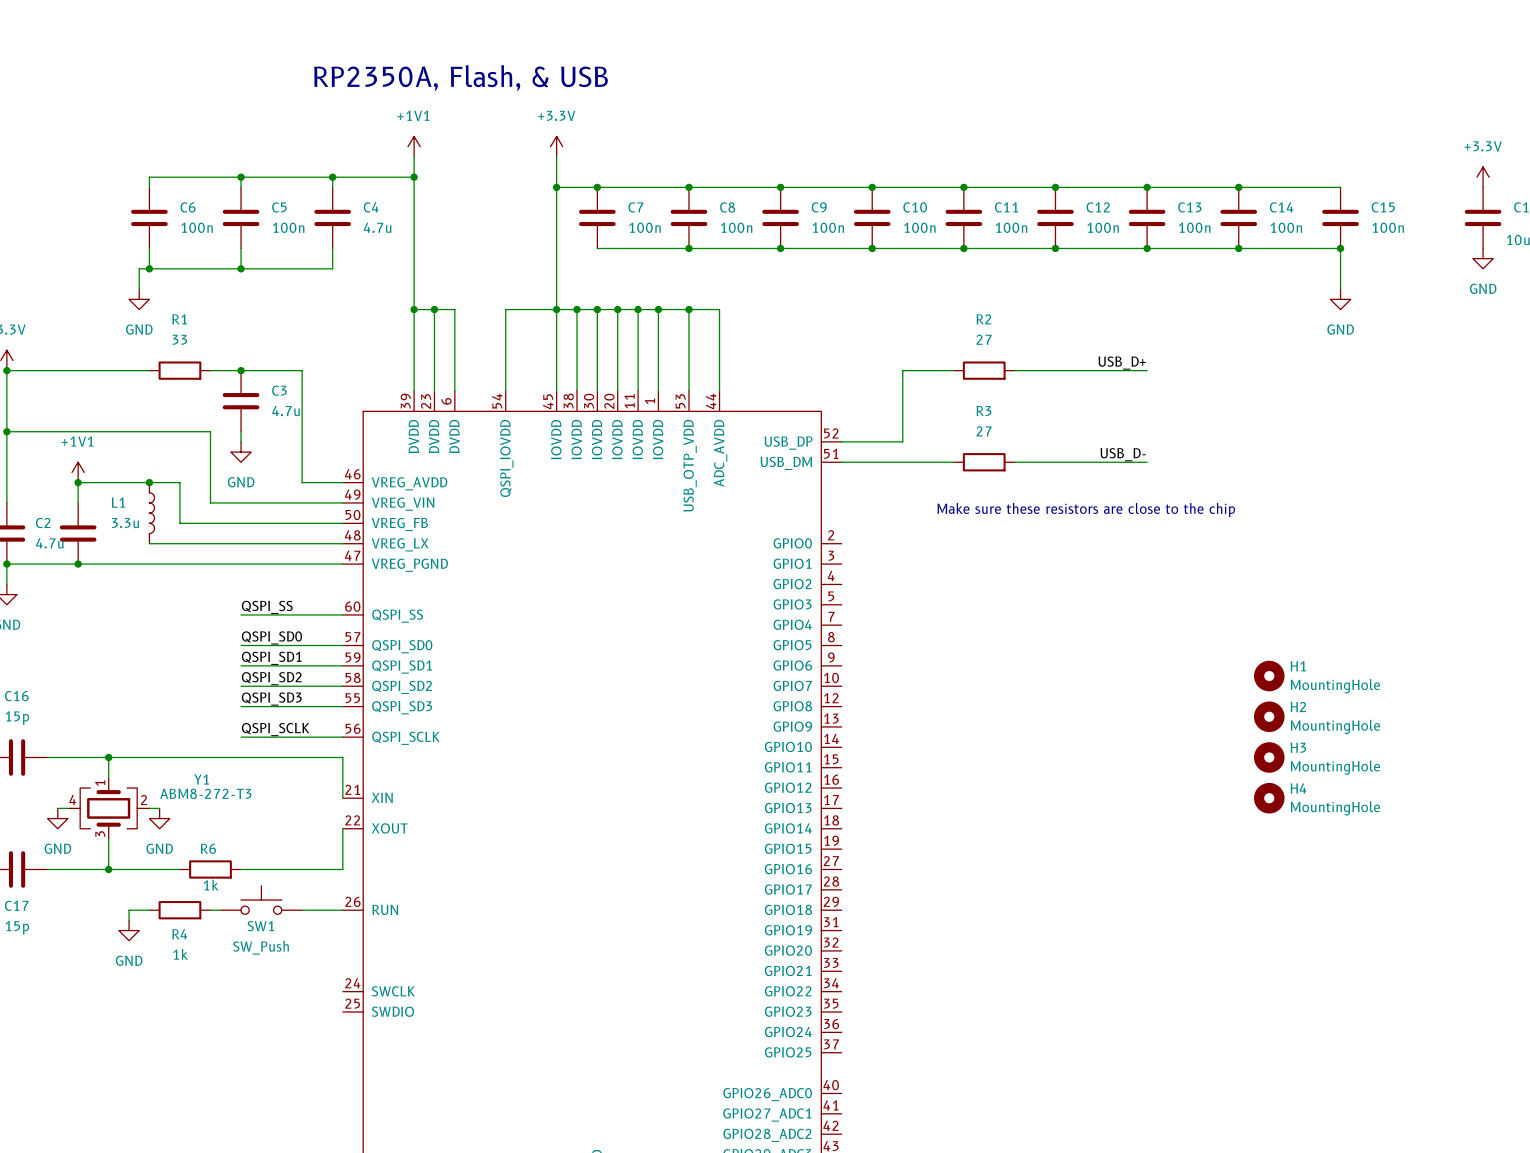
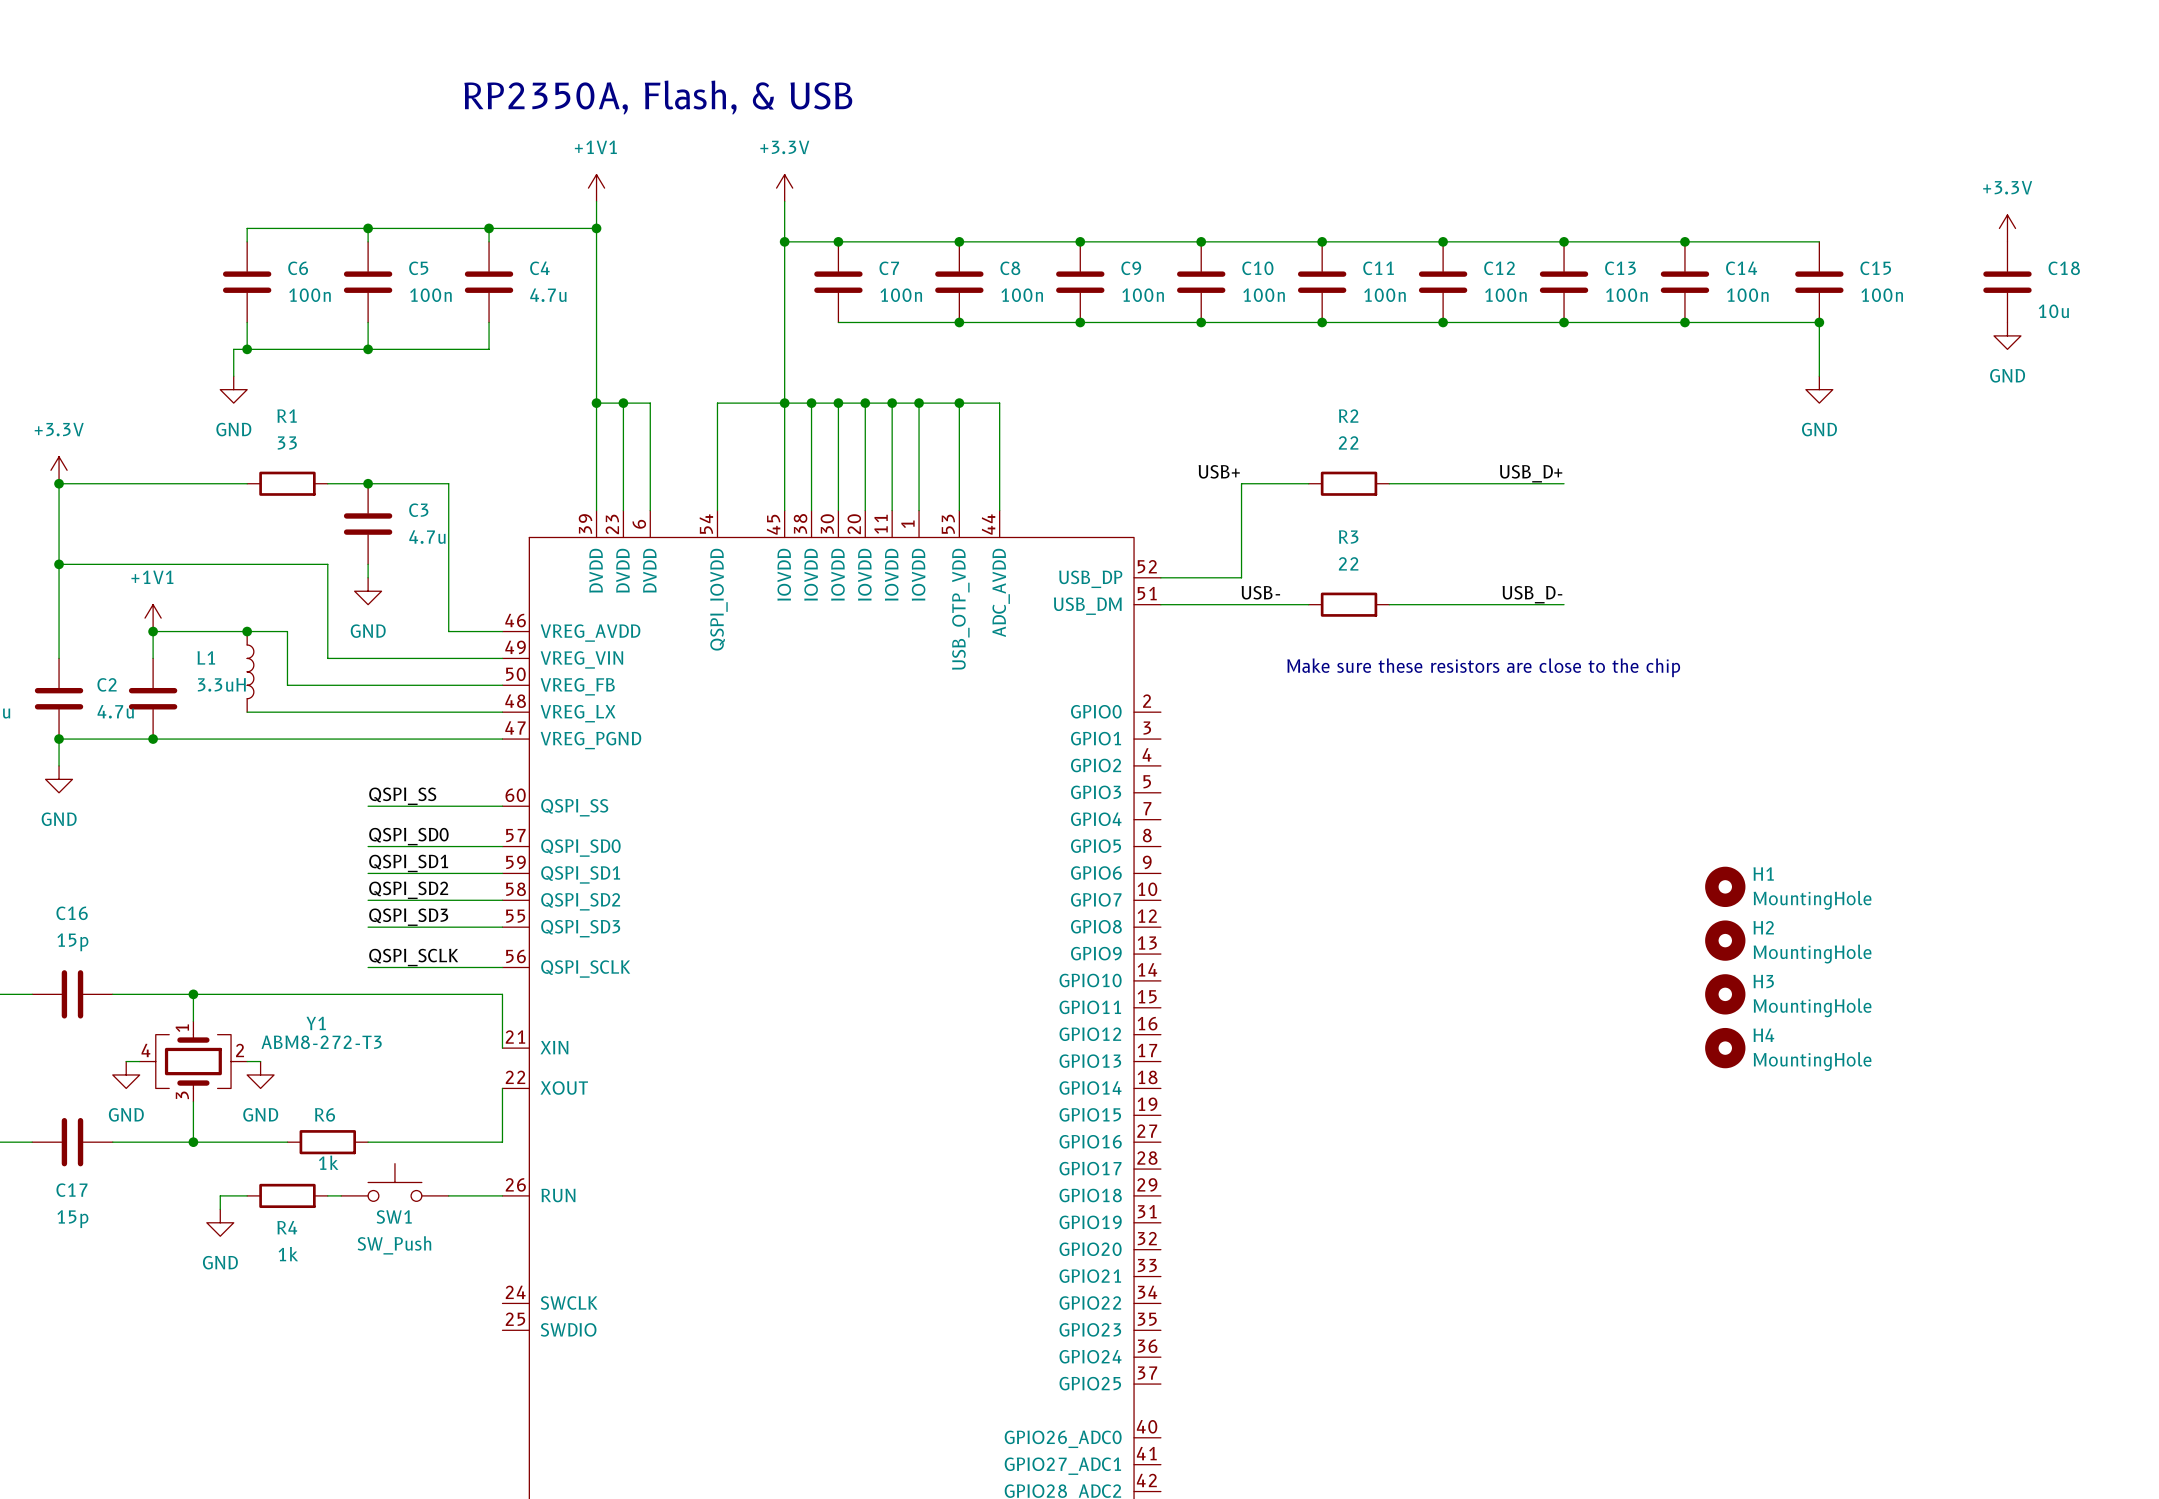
R2 value: 27 (984, 339) -> 22 (1348, 442)
label: none -> USB+ (1219, 471)
R3 value: 27 (984, 431) -> 22 (1348, 563)
label: none -> USB- (1260, 592)
L1 value: 3.3u (125, 523) -> 3.3uH (221, 684)

